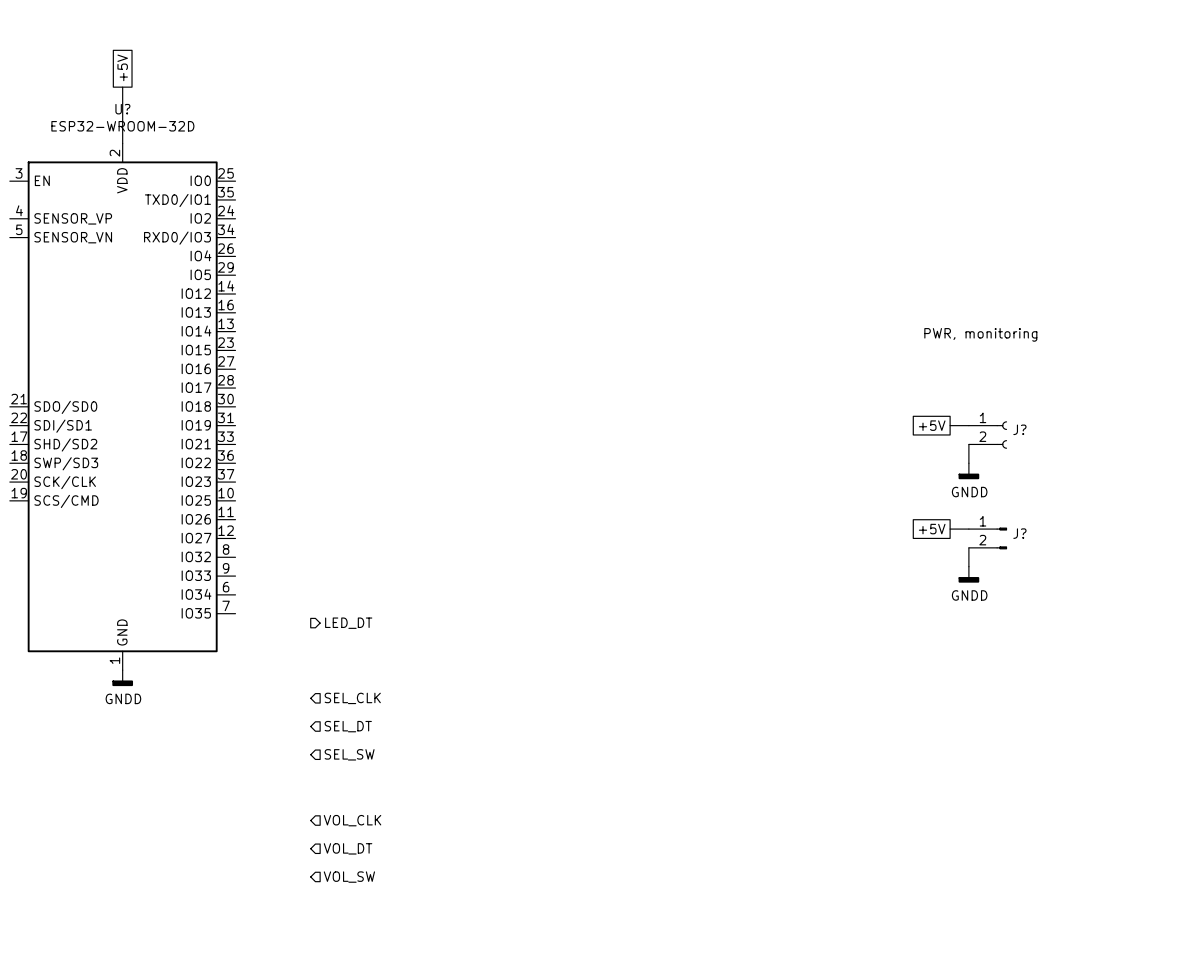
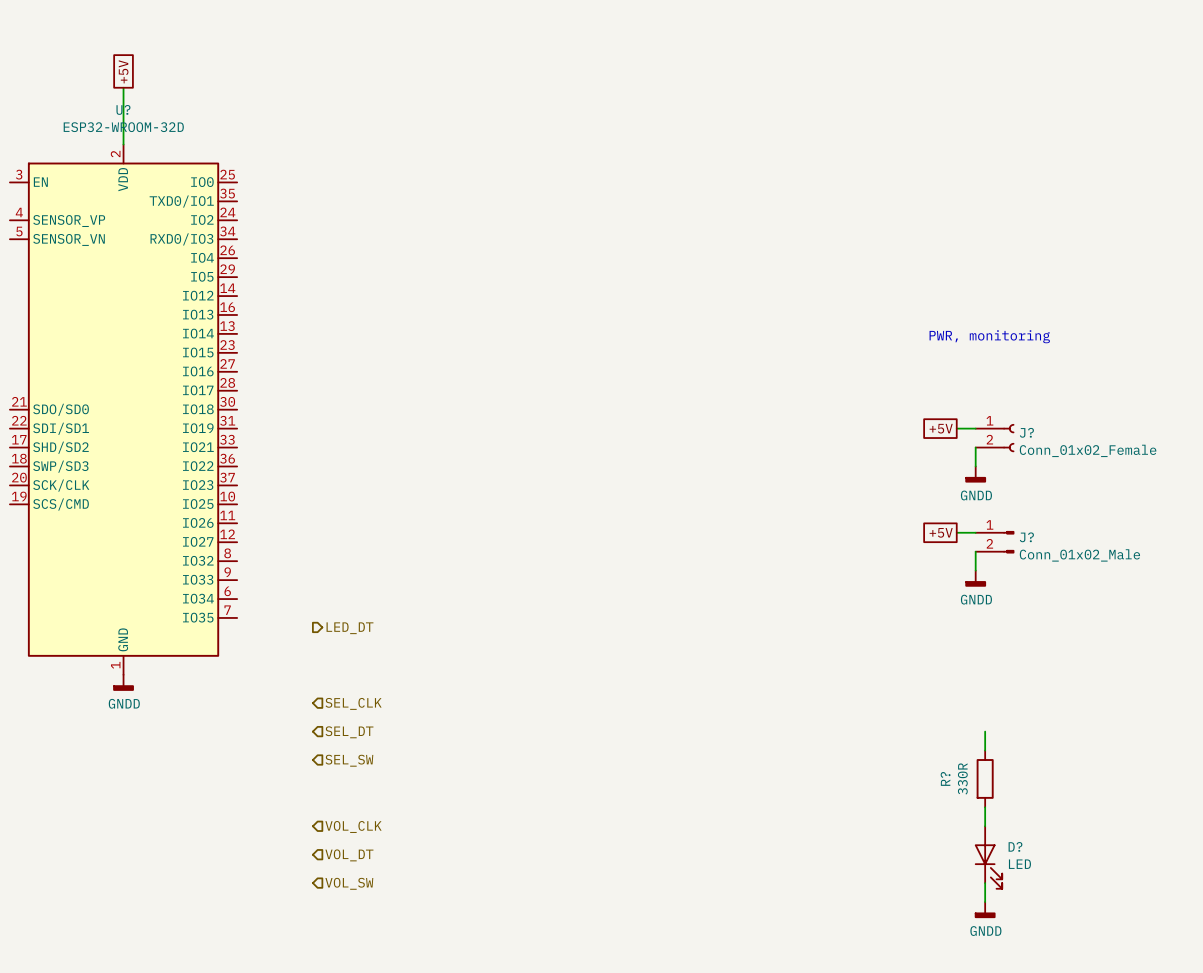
J? value: none -> Conn_01x02_Female (1088, 450)
J? value: none -> Conn_01x02_Male (1079, 555)
wire: none -> (985, 731) (985, 750)
R?: none -> 330R (985, 778)
wire: none -> (985, 807) (985, 826)
D?: none -> LED (988, 857)
wire: none -> (985, 883) (985, 902)
power symbol: none -> GNDD (985, 910)

